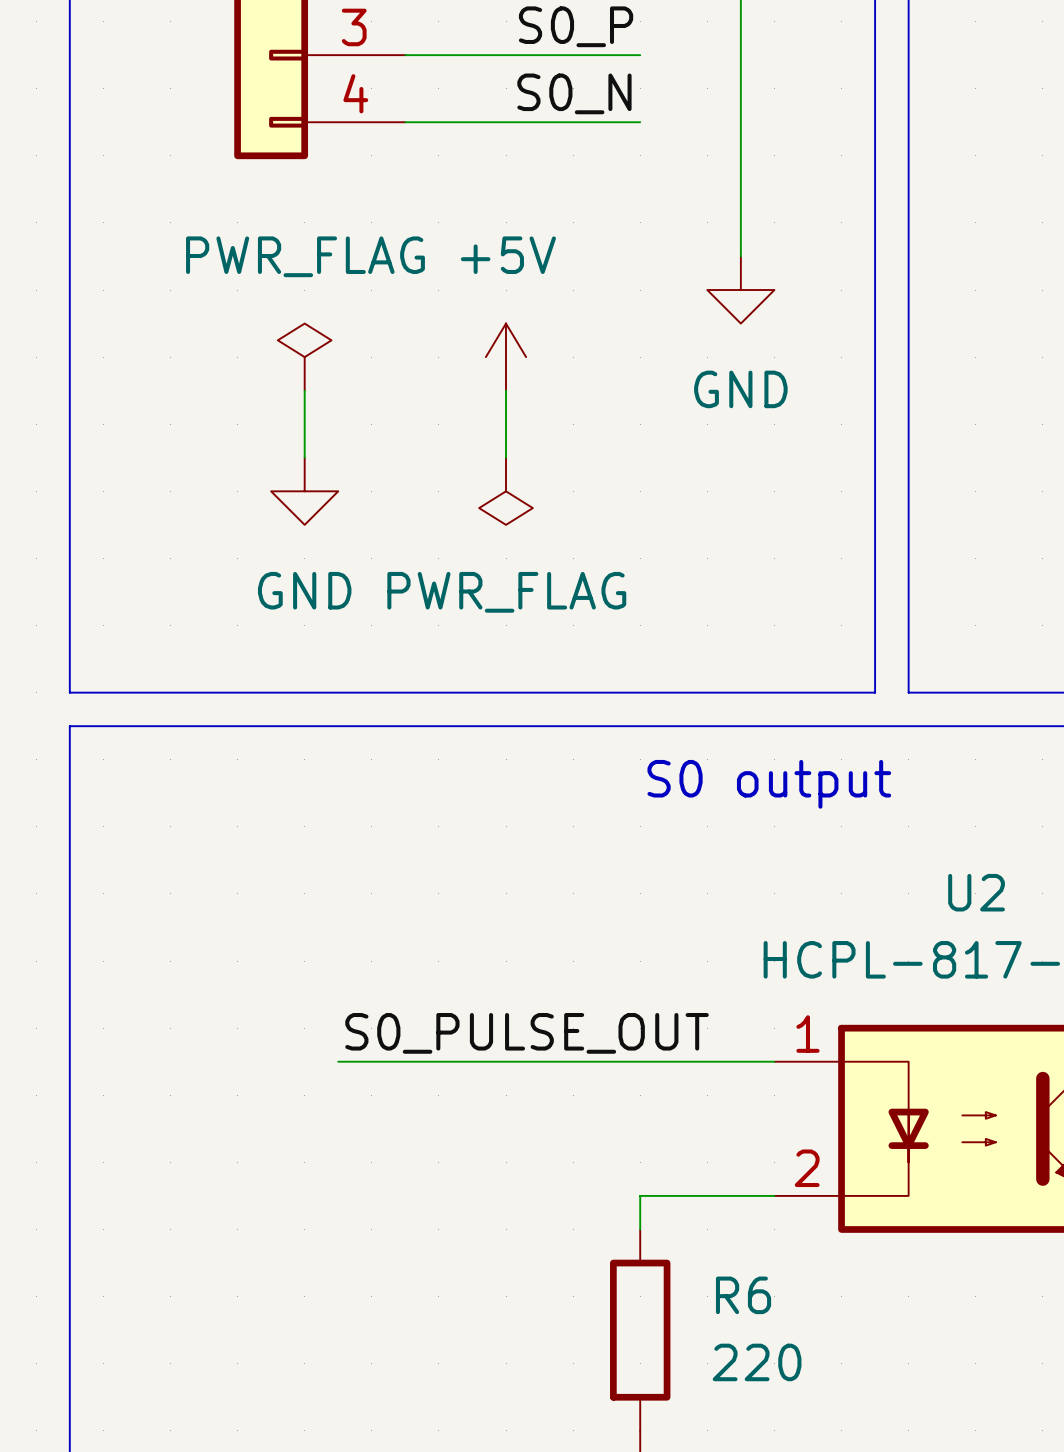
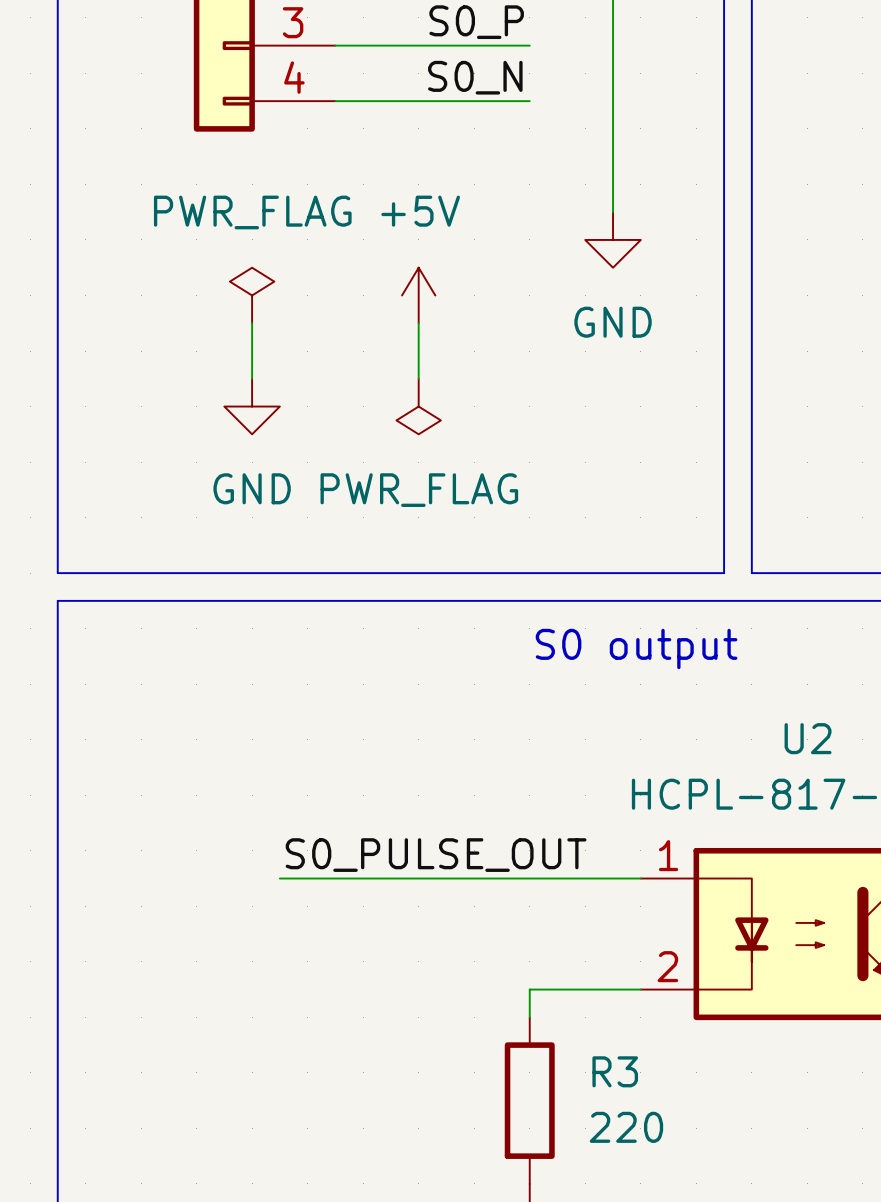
R6 name: R6 (743, 1295) -> R3 (615, 1071)

